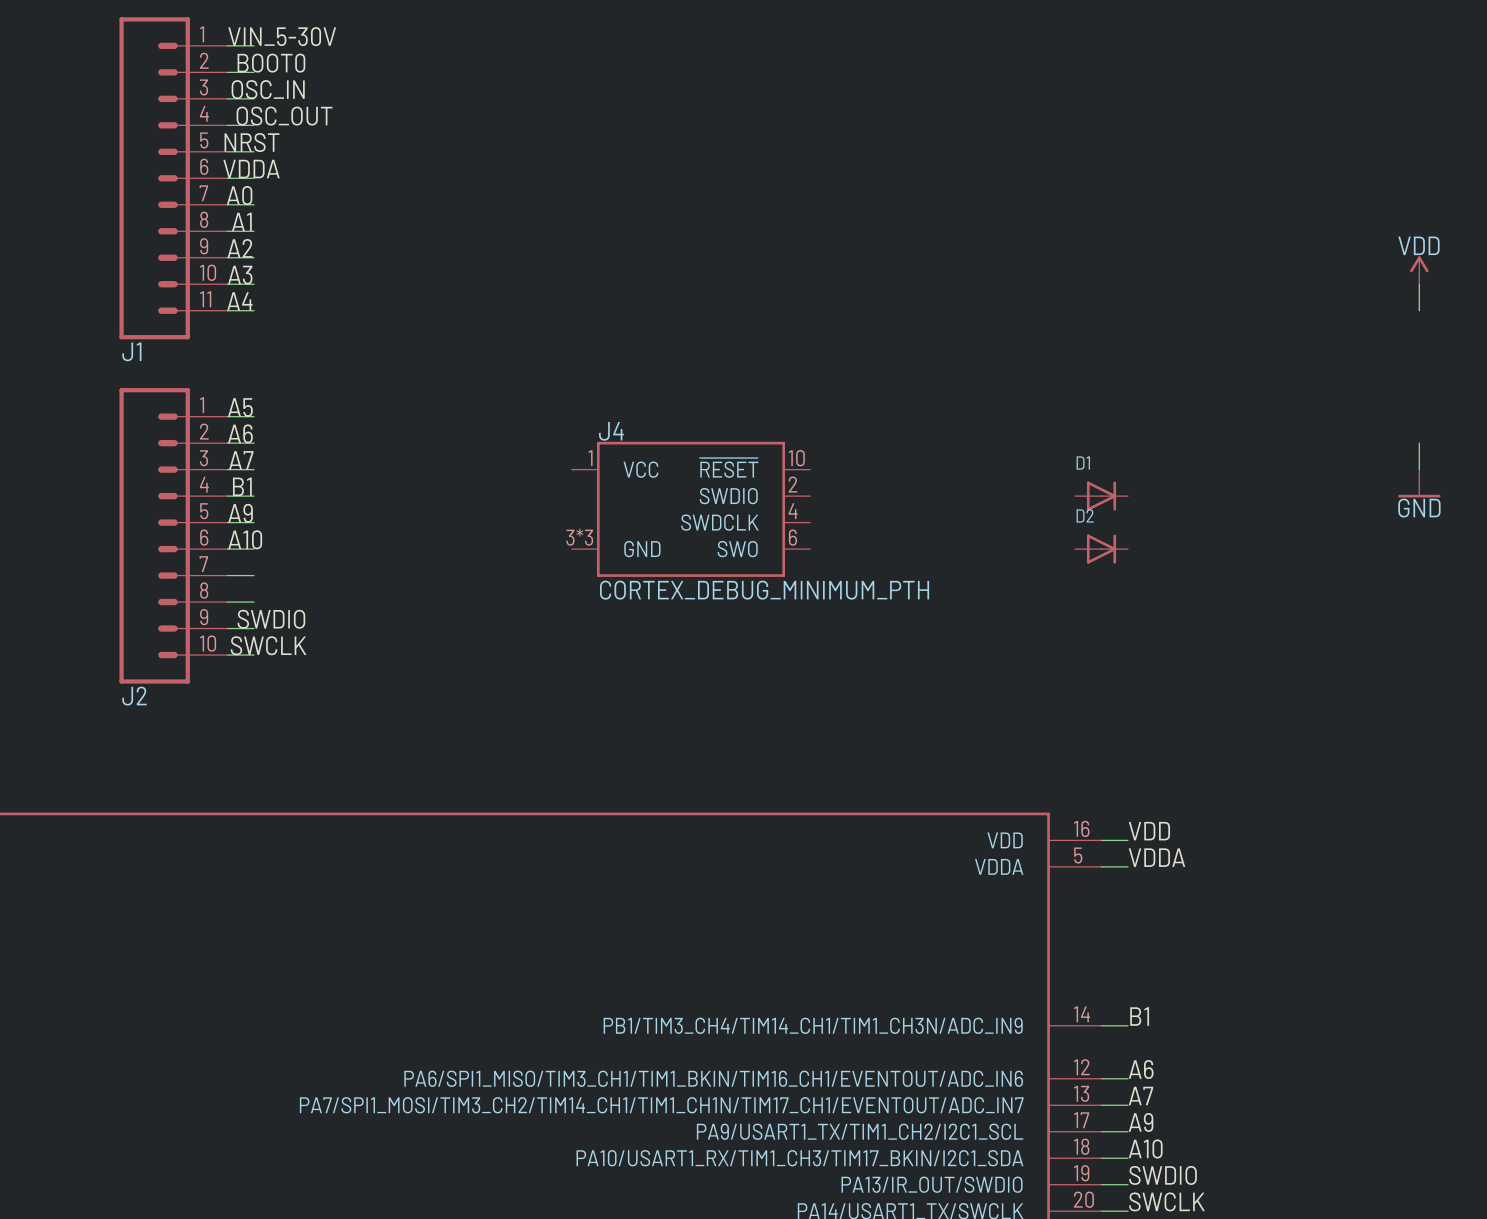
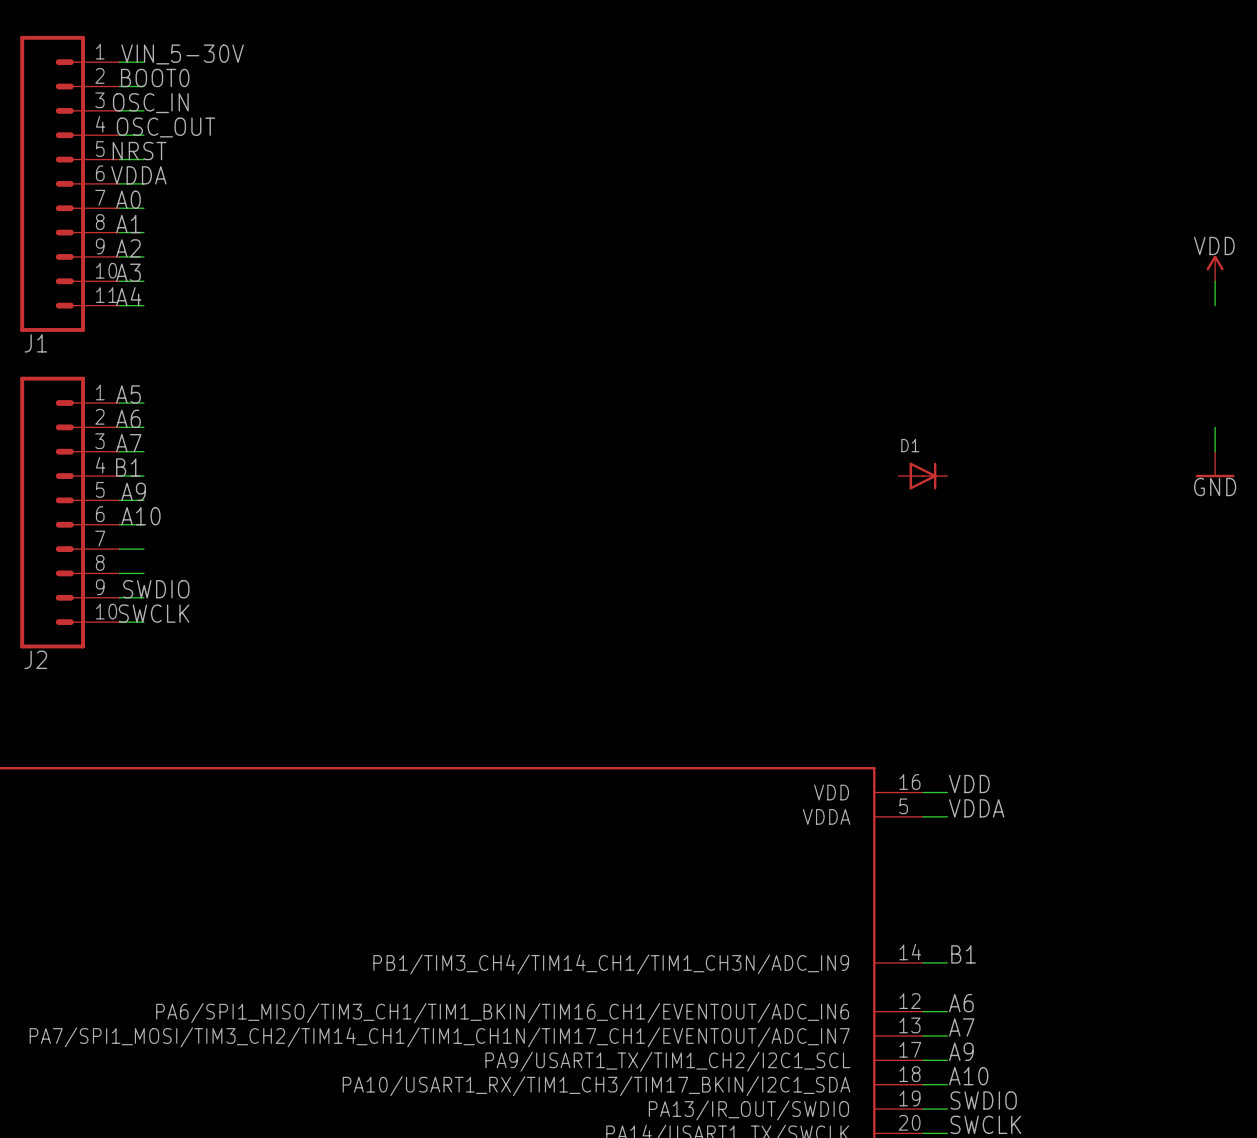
J4: CORTEX_DEBUG_MINIMUM_PTH (691, 509) -> none
D2: (1101, 549) -> none

